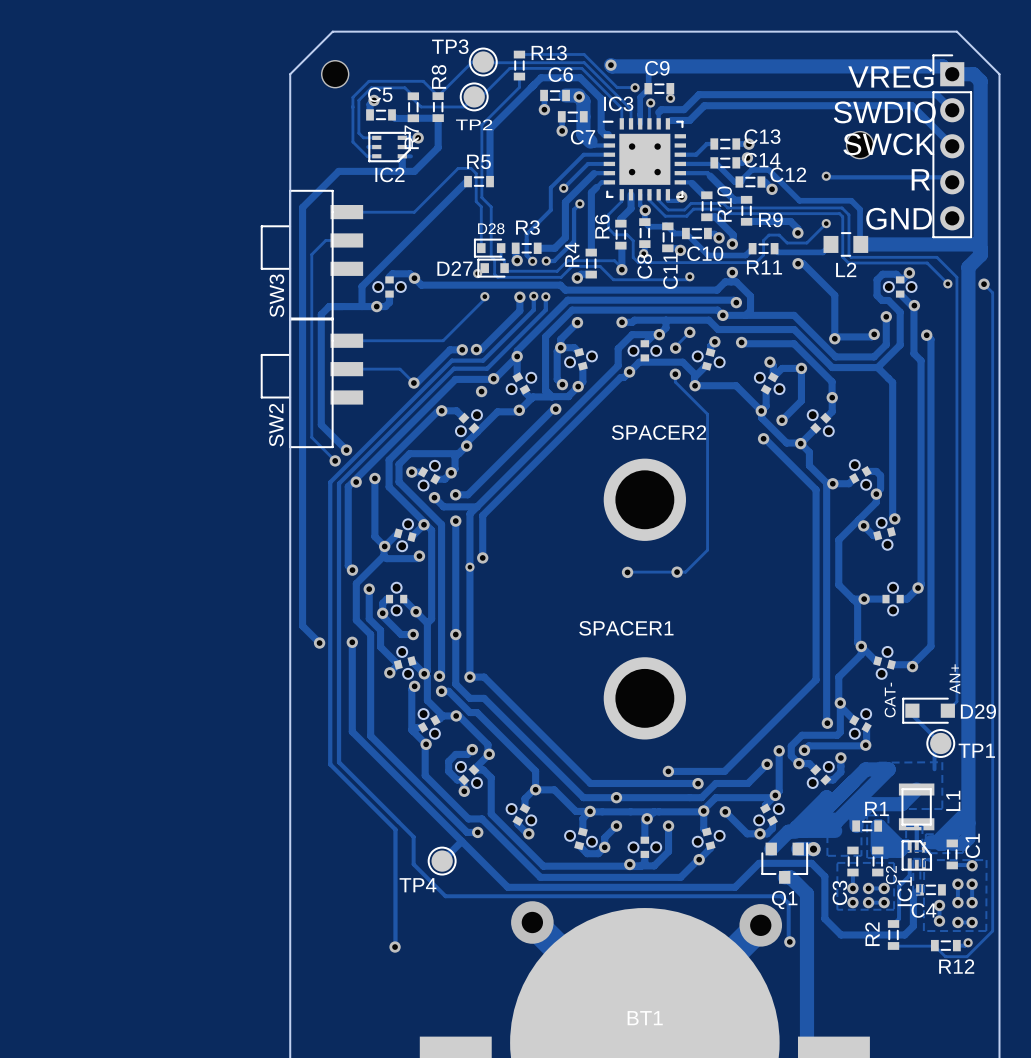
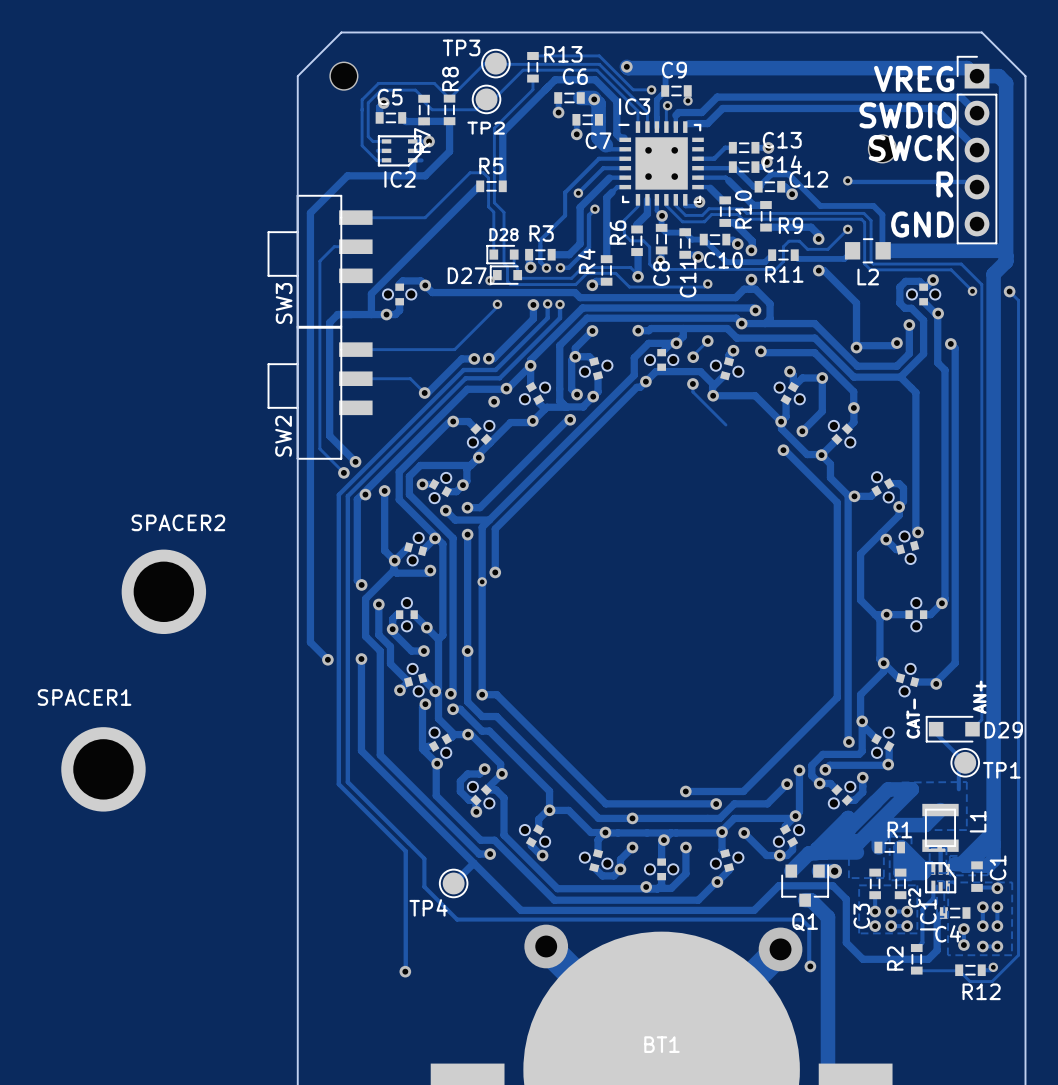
track: (707, 414) (707, 550) (685, 572) (627, 572) -> none
SPACER2 position: (644, 499) -> (163, 591)
via: (627, 572) -> none
via: (677, 572) -> none
SPACER1 position: (644, 698) -> (103, 769)

